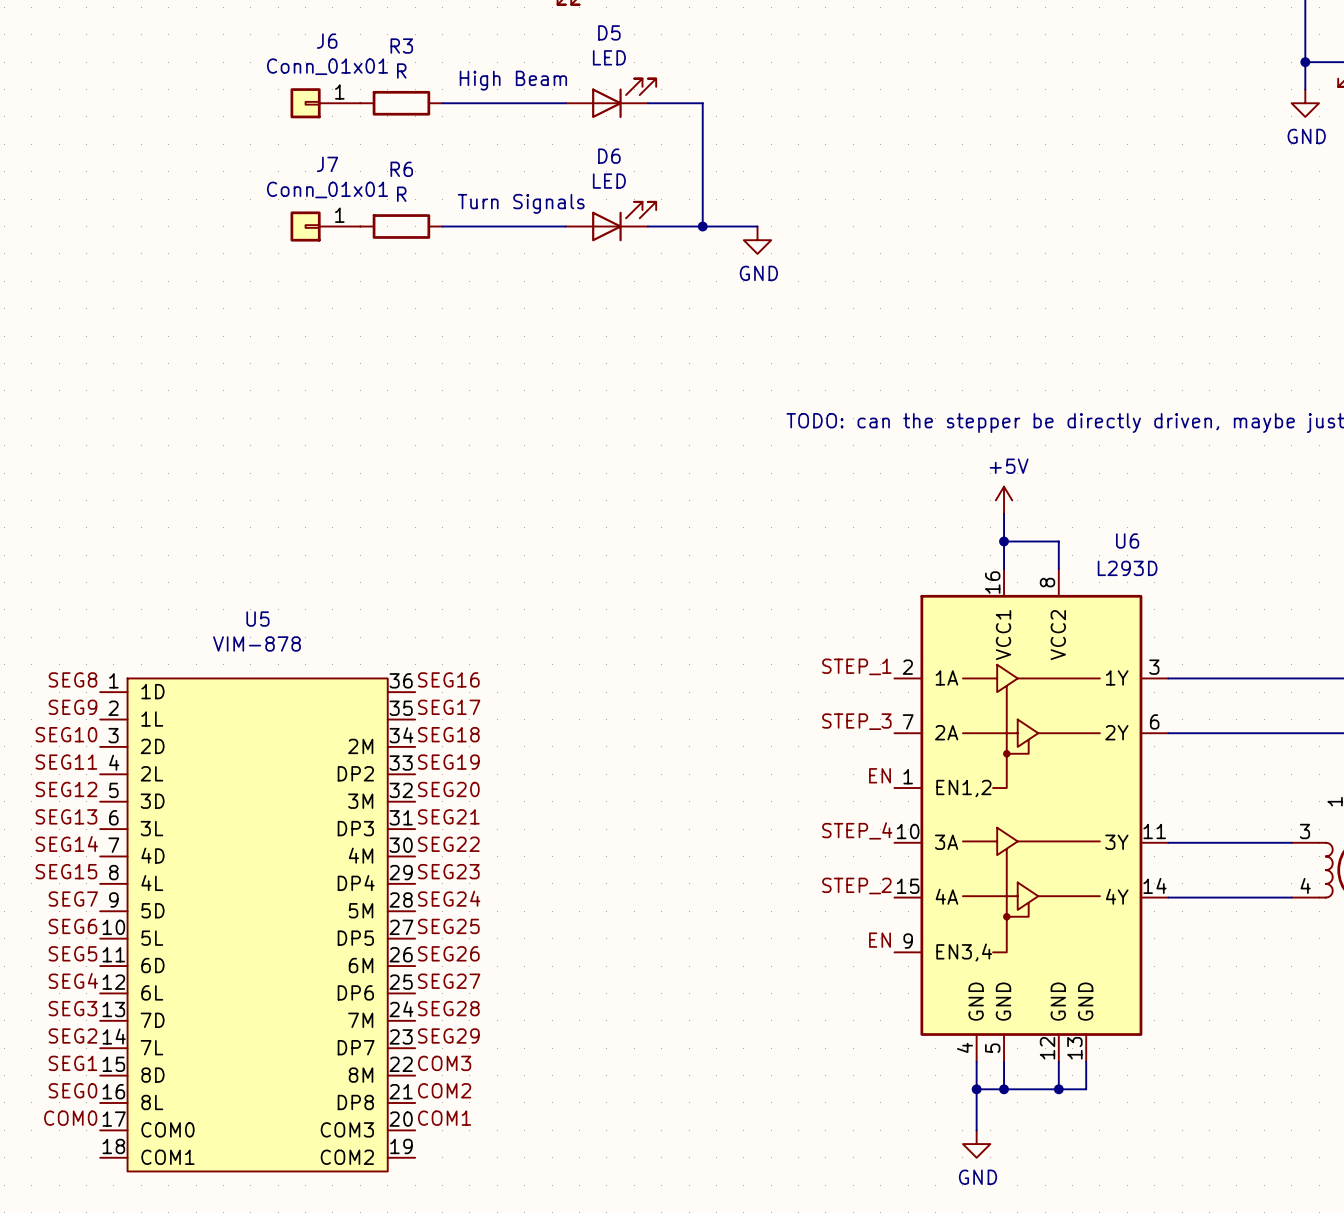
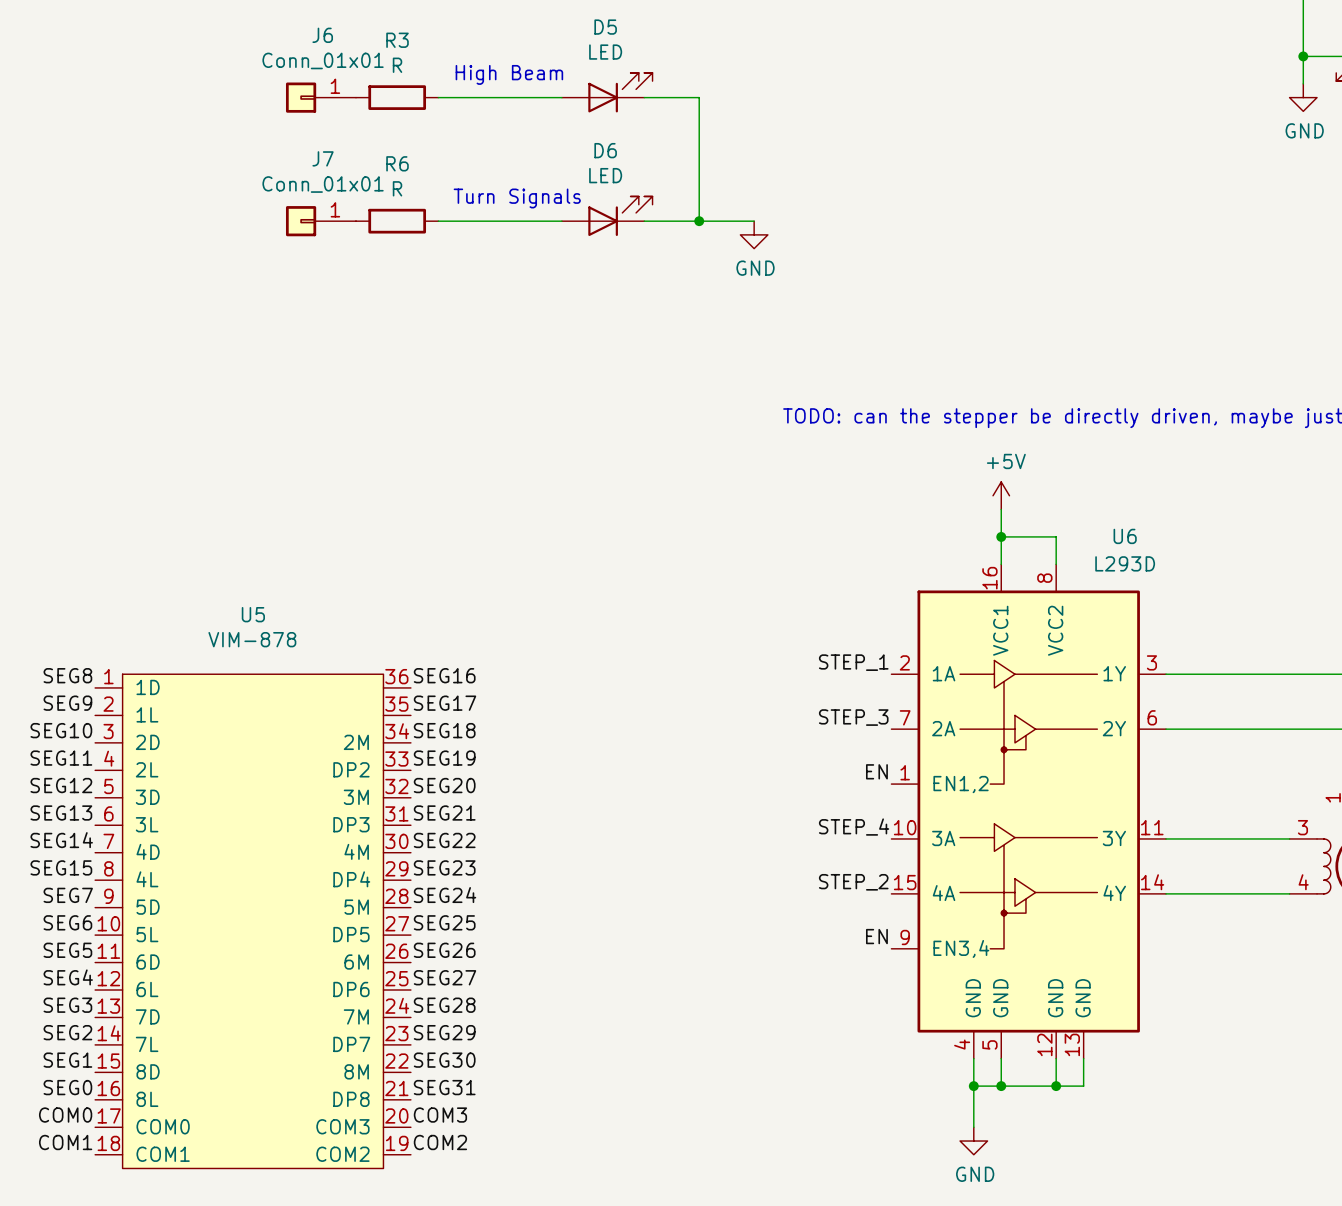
label: COM3 (444, 1063) -> SEG30 (444, 1060)
label: COM2 (444, 1090) -> SEG31 (444, 1087)
label: COM1 (444, 1118) -> COM3 (440, 1115)
label: none -> COM1 (65, 1142)
label: none -> COM2 (440, 1142)

